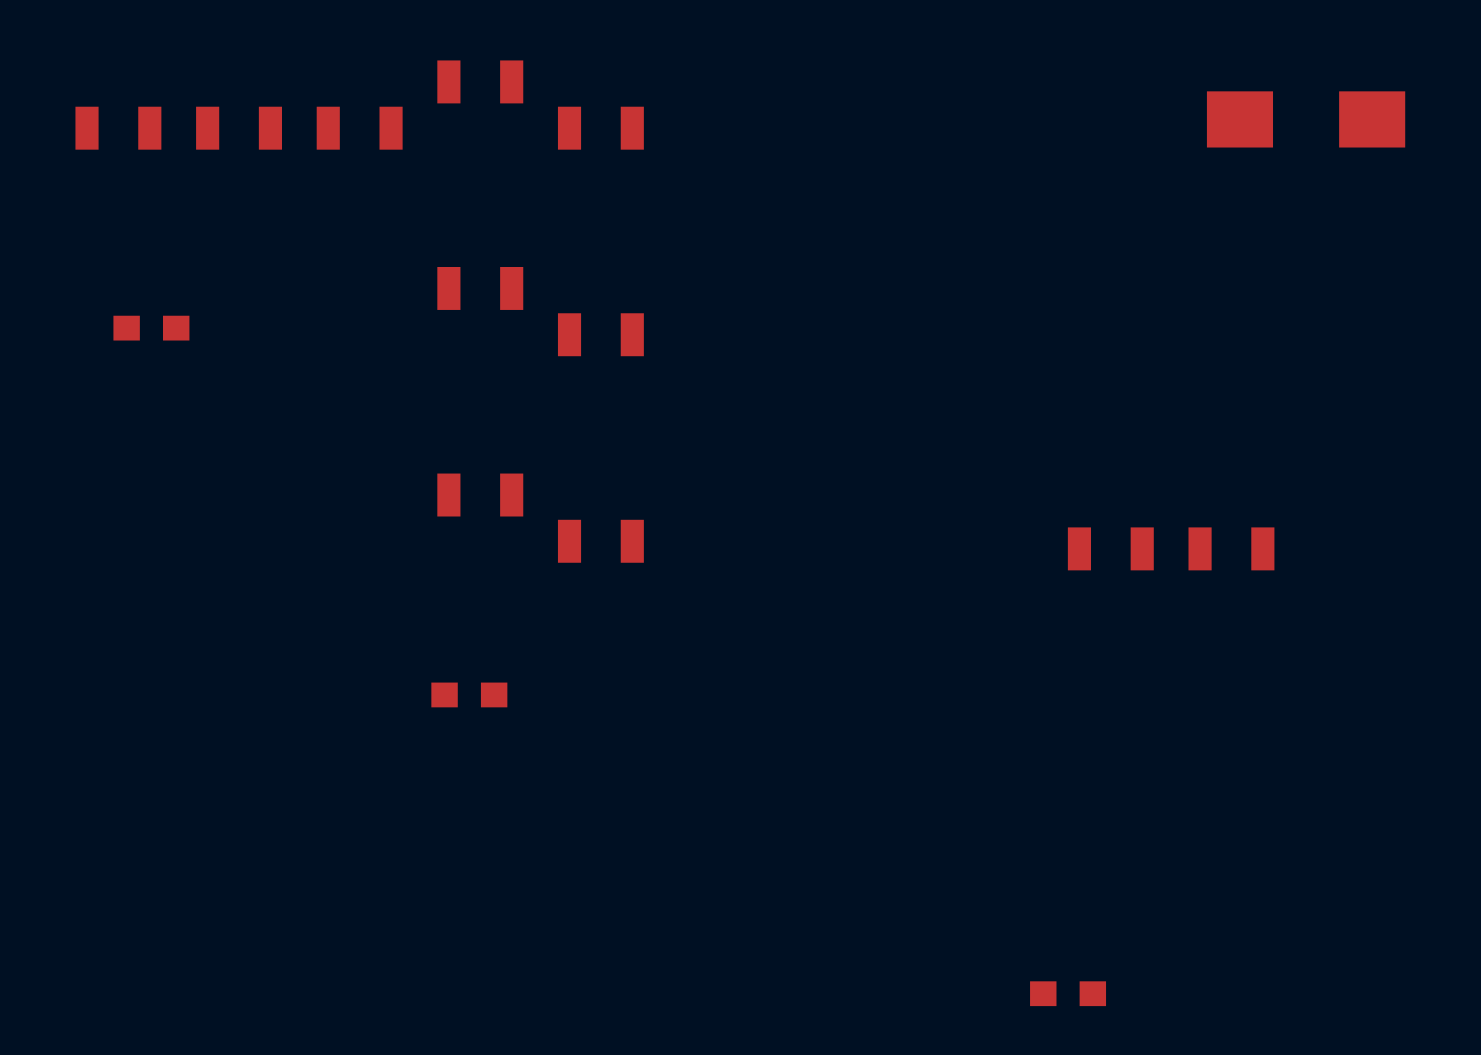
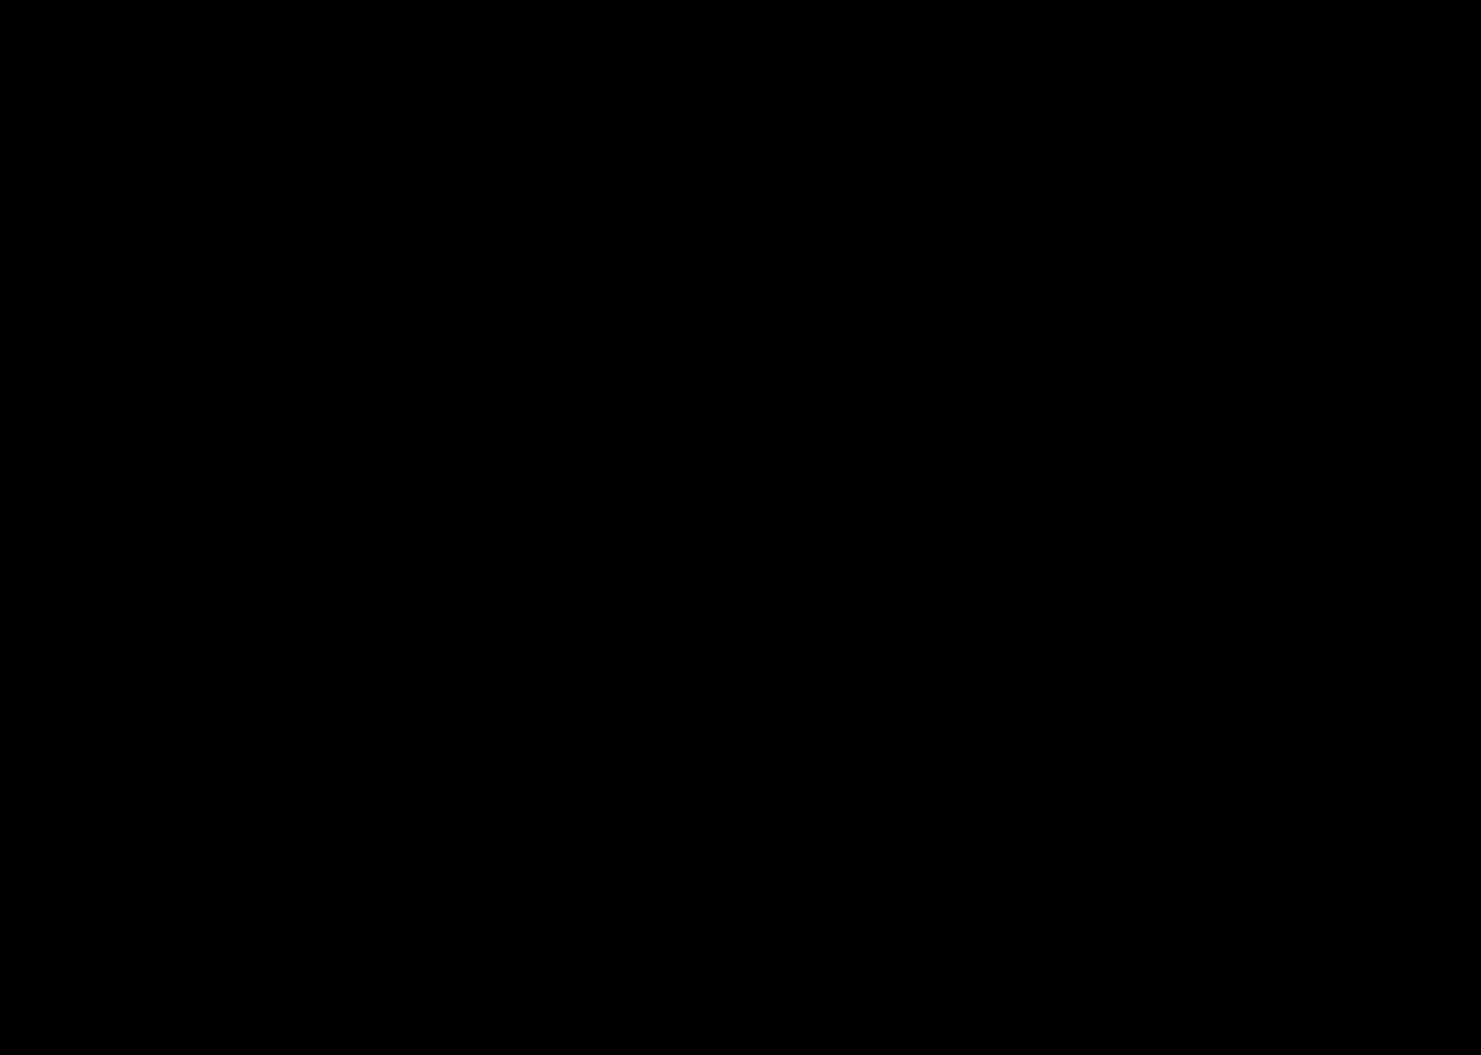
part: (480, 81) -> none
part: (1306, 119) -> none
part: (118, 128) -> none
part: (239, 128) -> none
part: (359, 128) -> none
part: (600, 128) -> none
part: (480, 288) -> none
part: (151, 328) -> none
part: (600, 334) -> none
part: (480, 495) -> none
part: (600, 541) -> none
part: (1110, 548) -> none
part: (1231, 548) -> none
part: (469, 694) -> none
part: (1068, 993) -> none

